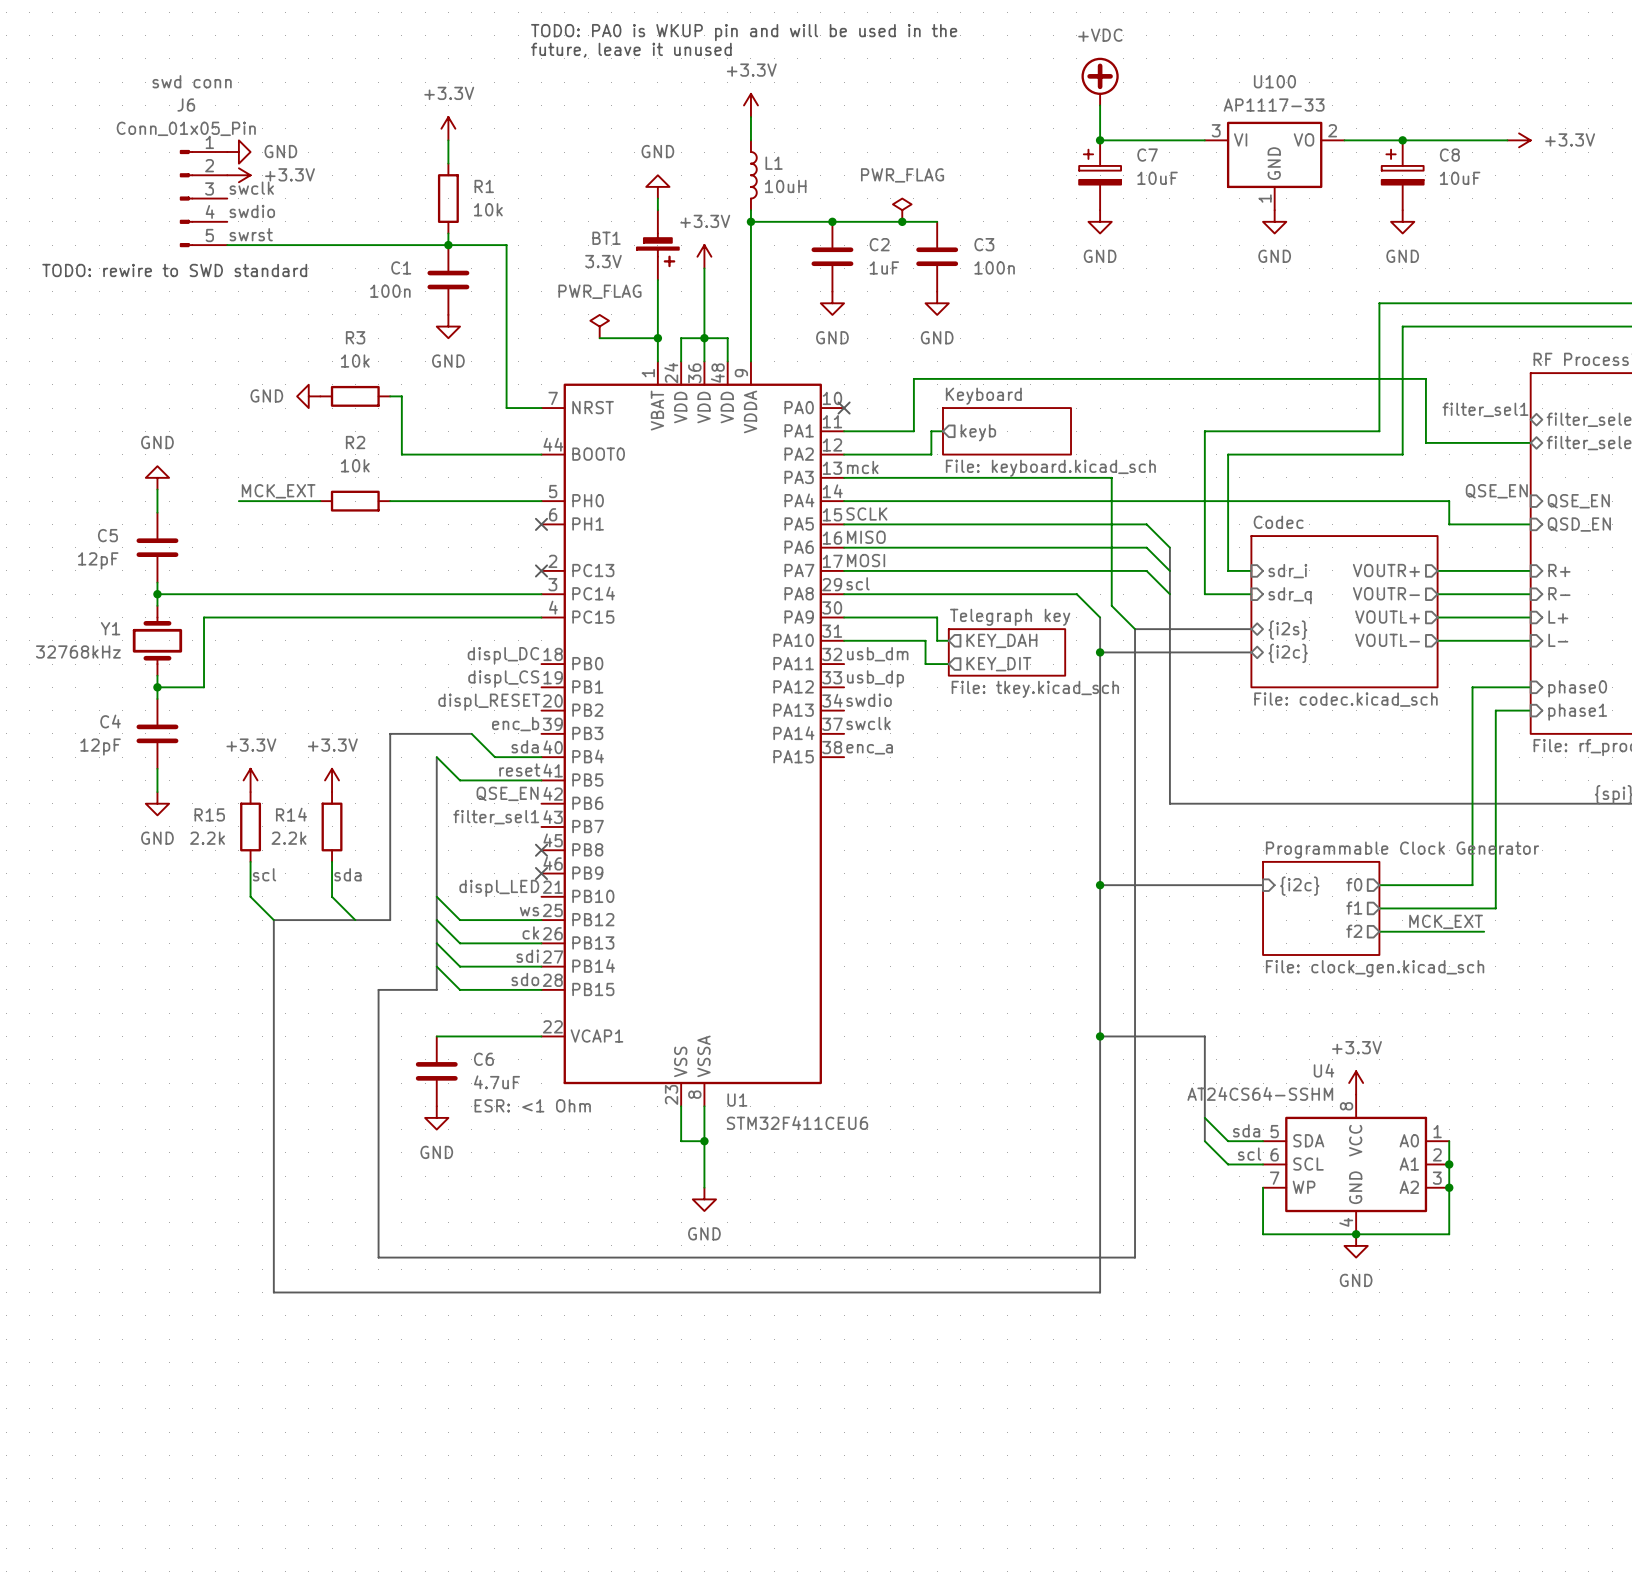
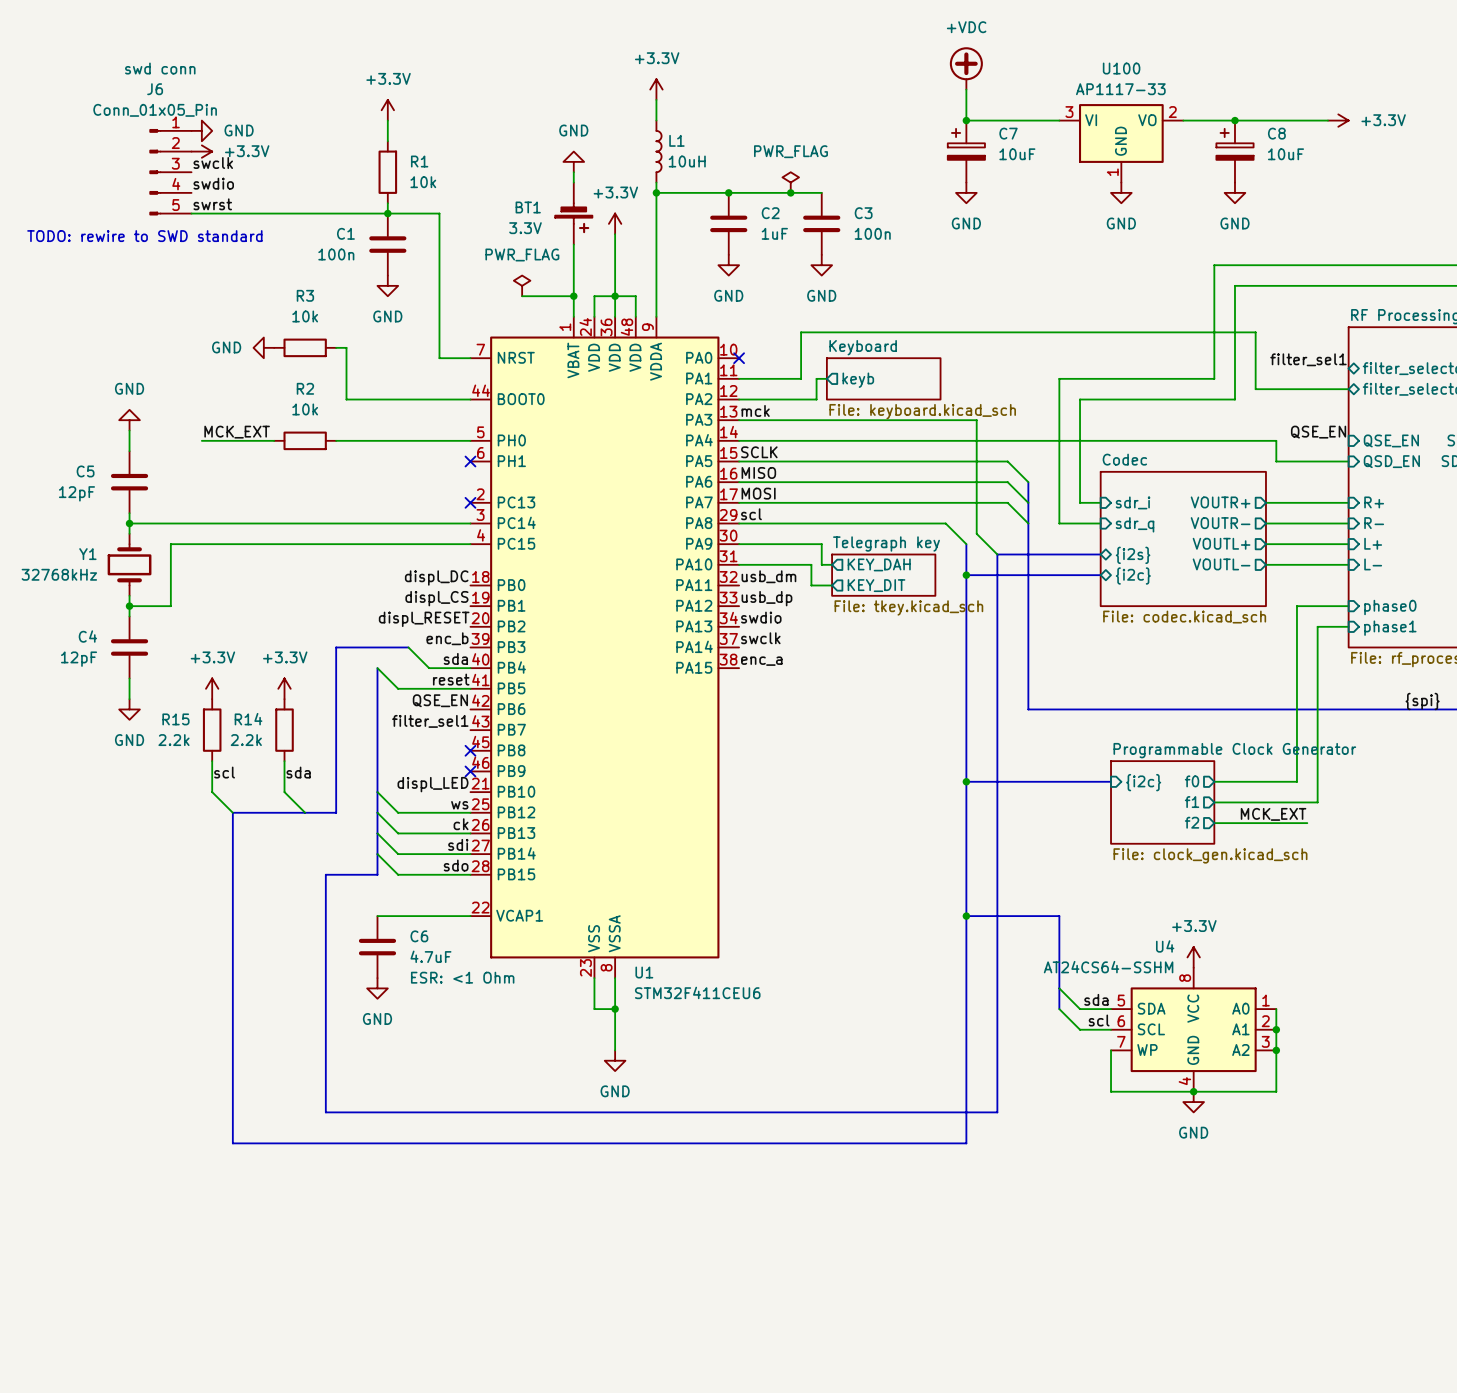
text: TODO: PA0 is WKUP pin and will be used in the (744, 32) -> none
text: future, leave it unused (631, 50) -> none

